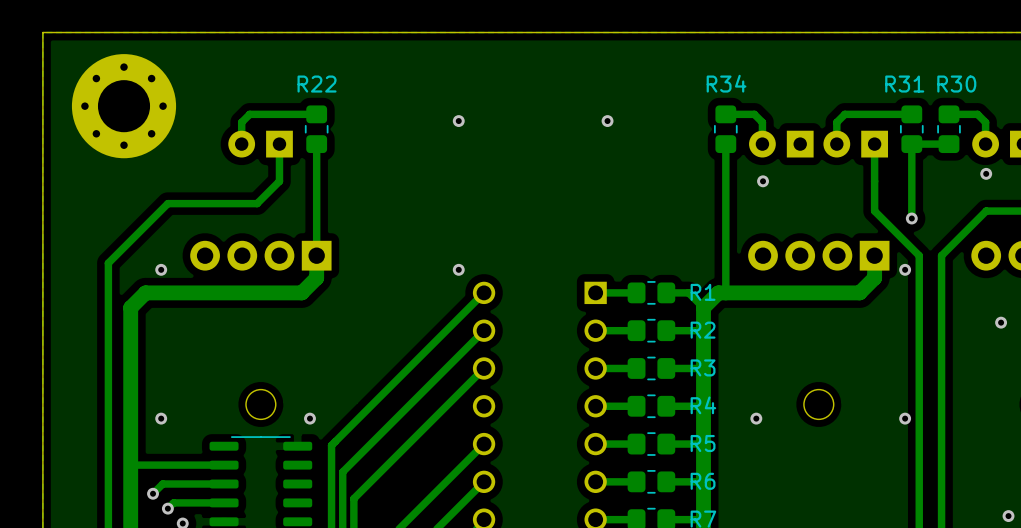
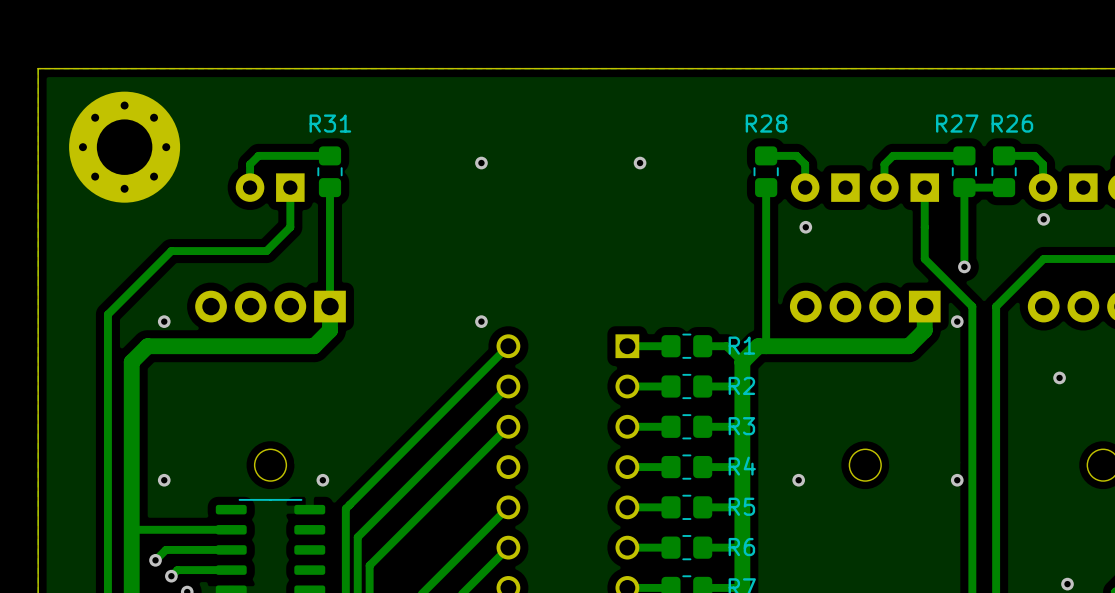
R34 name: R34 (726, 83) -> R28 (766, 123)
R22 name: R22 (317, 84) -> R31 (330, 123)
R31 name: R31 (904, 84) -> R27 (957, 123)
R30 name: R30 (956, 84) -> R26 (1012, 123)

